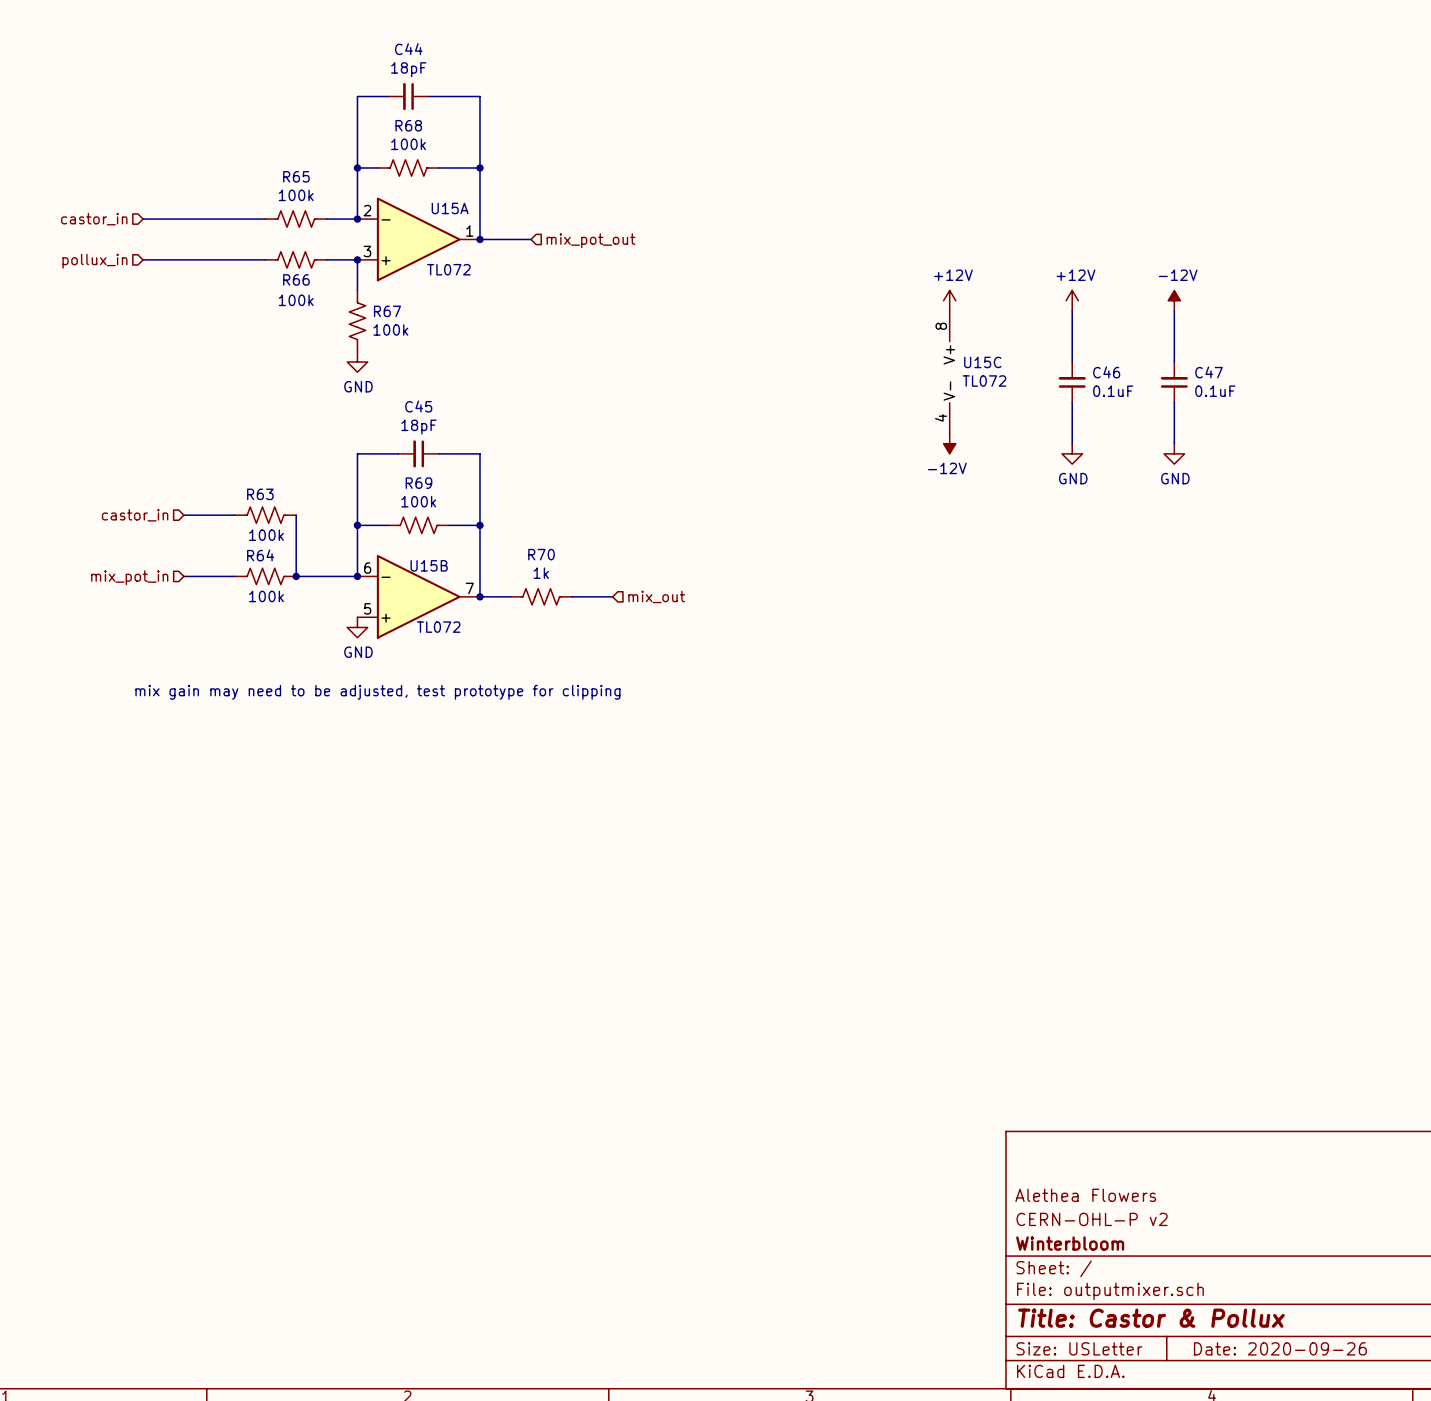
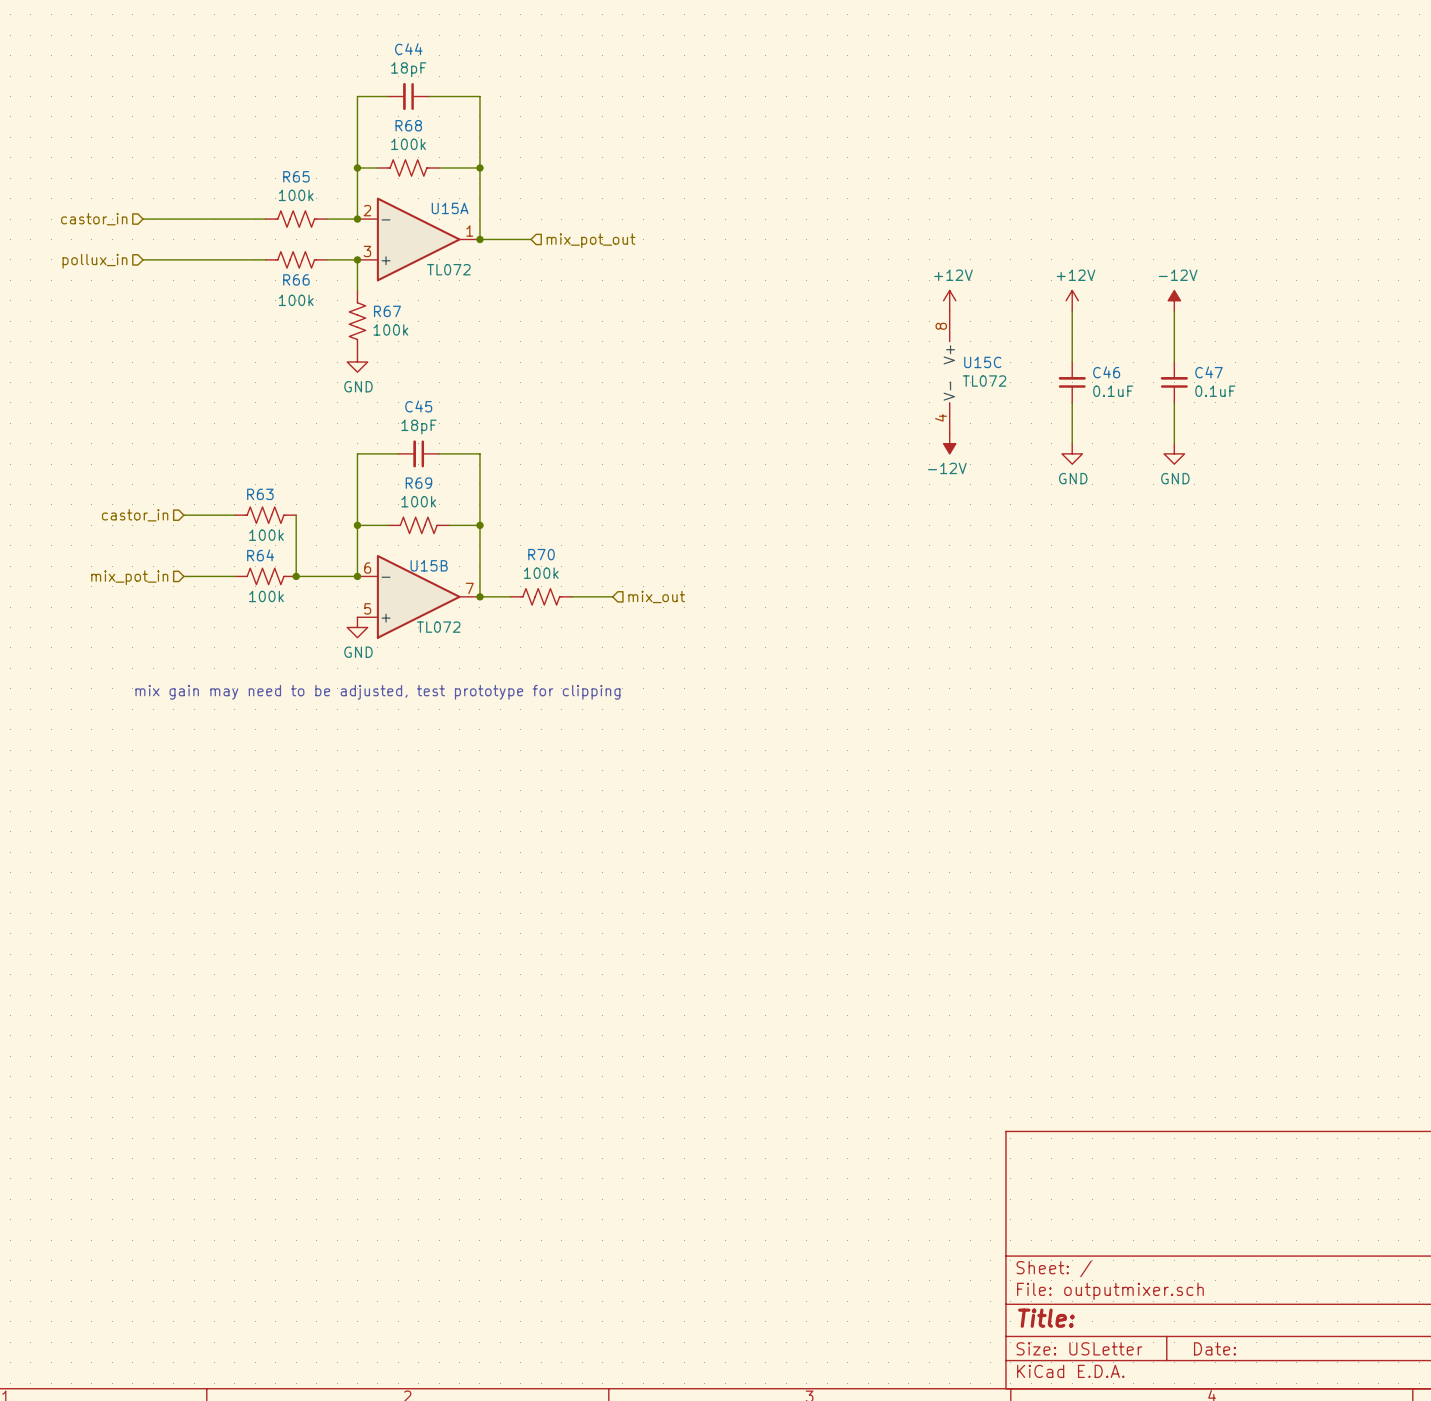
R70 value: 1k (541, 573) -> 100k (541, 573)
title block: Alethea Flowers (1085, 1195) -> none
title block: CERN-OHL-P v2 (1092, 1219) -> none
title block: Winterbloom (1070, 1243) -> none
title block: Title: Castor & Pollux (1151, 1318) -> Title: (1046, 1318)
title block: Date: 2020-09-26 (1280, 1348) -> Date: (1214, 1348)

